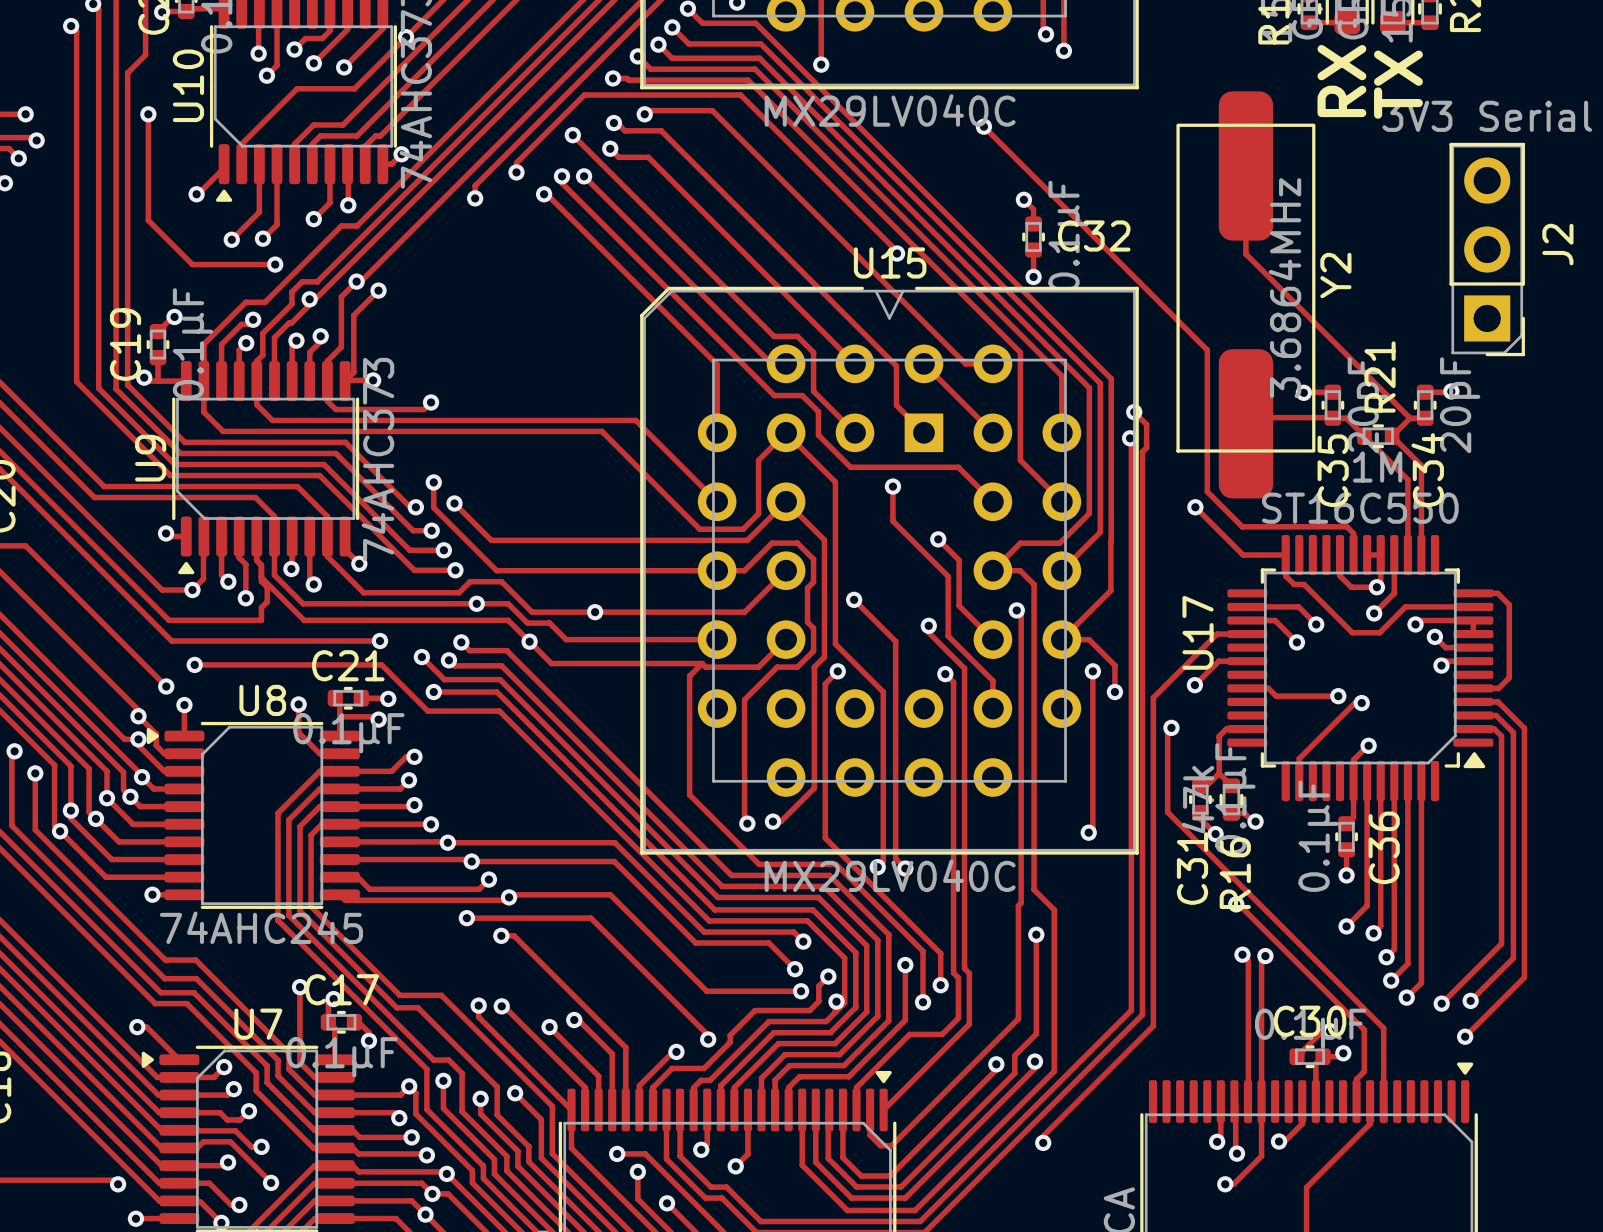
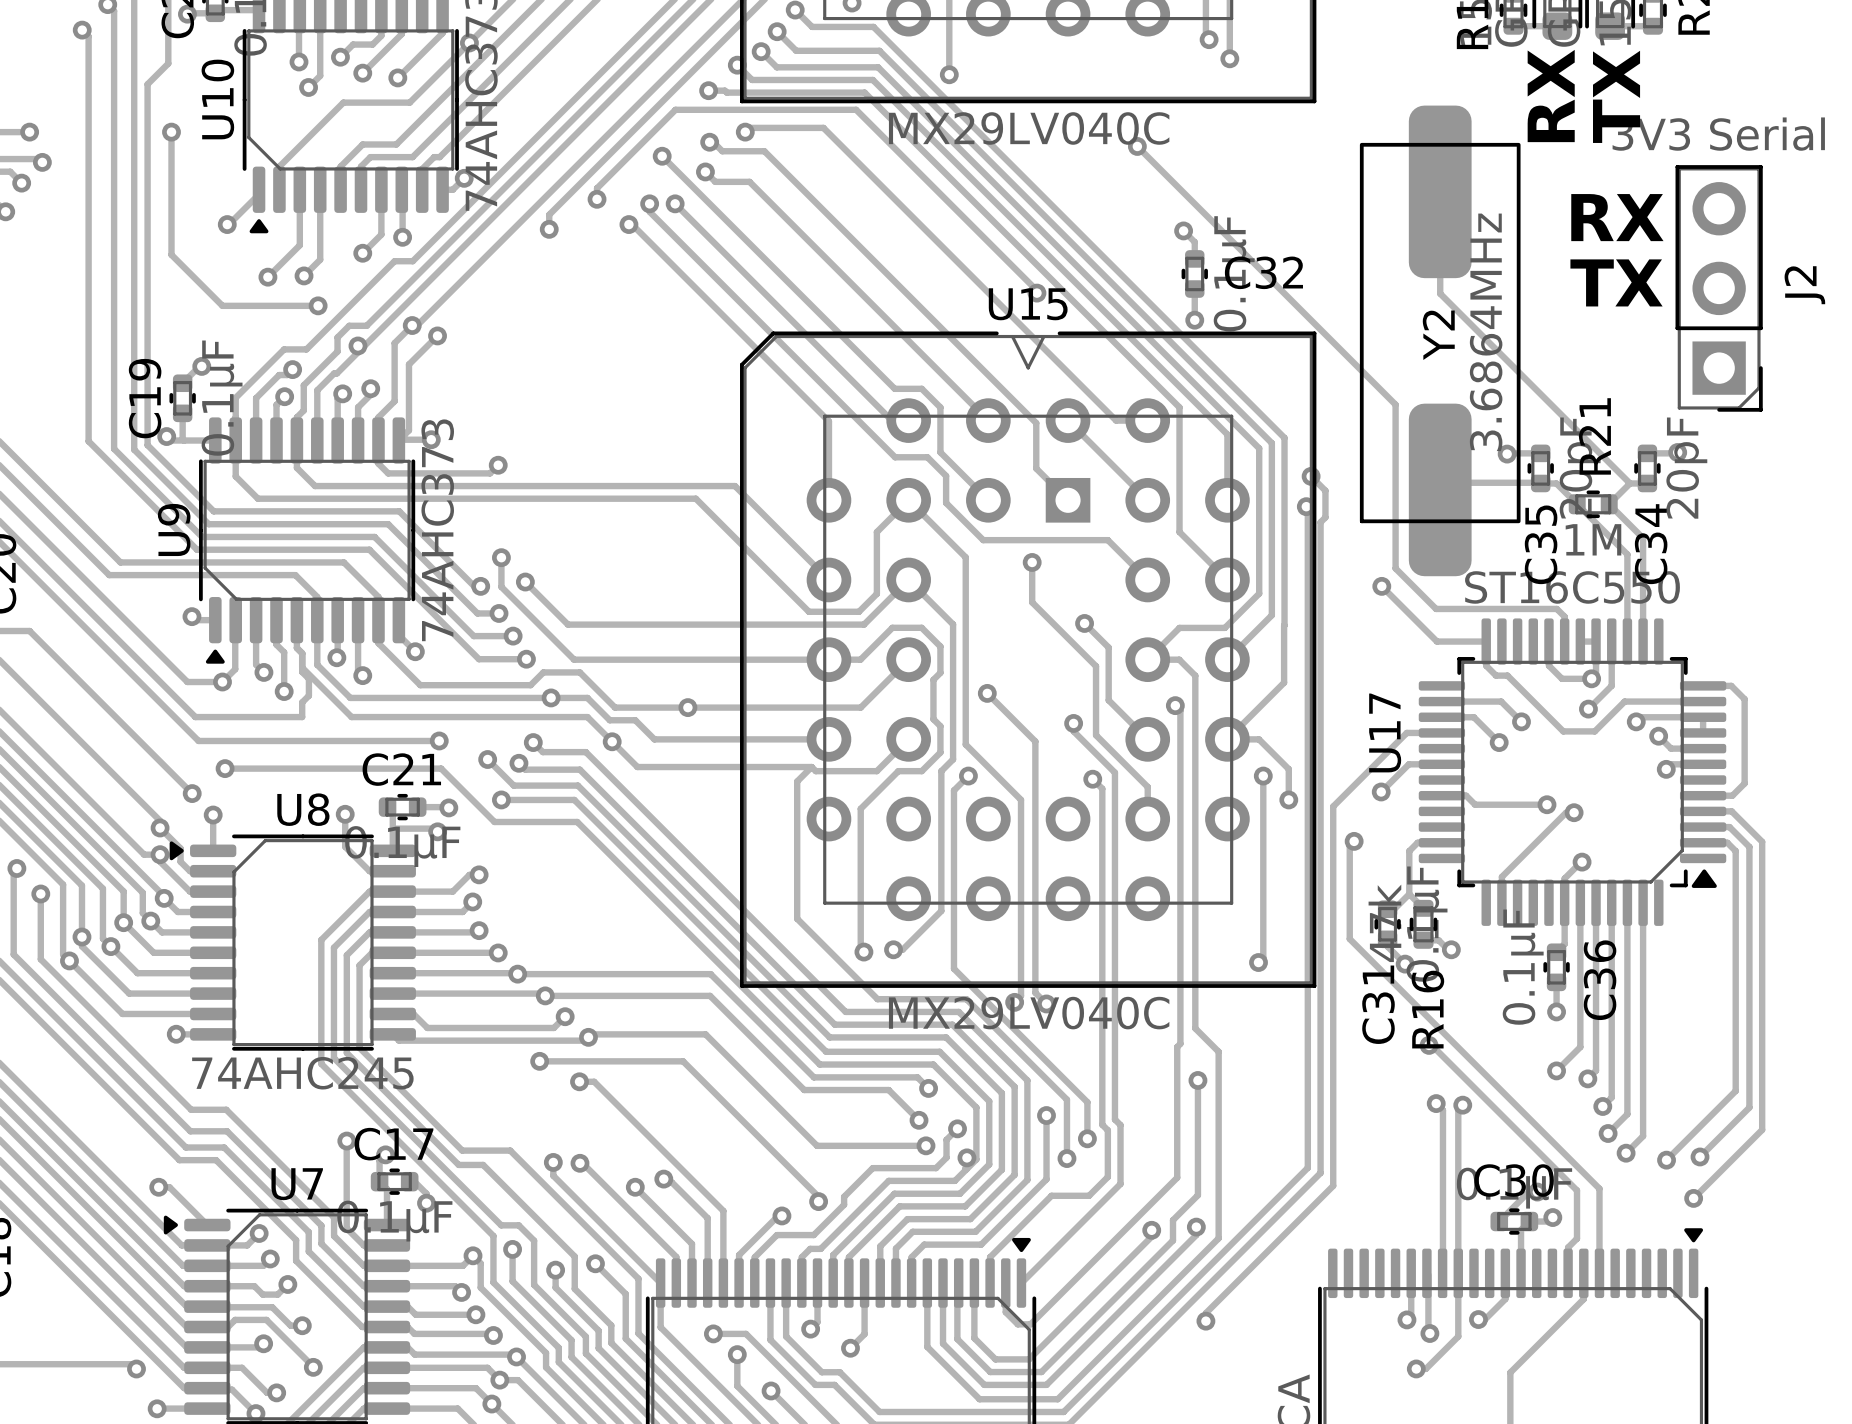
text: none -> RX (1617, 217)
text: none -> TX (1616, 282)
Y2 name position: Y2 (1335, 275) -> Y2 (1438, 335)

